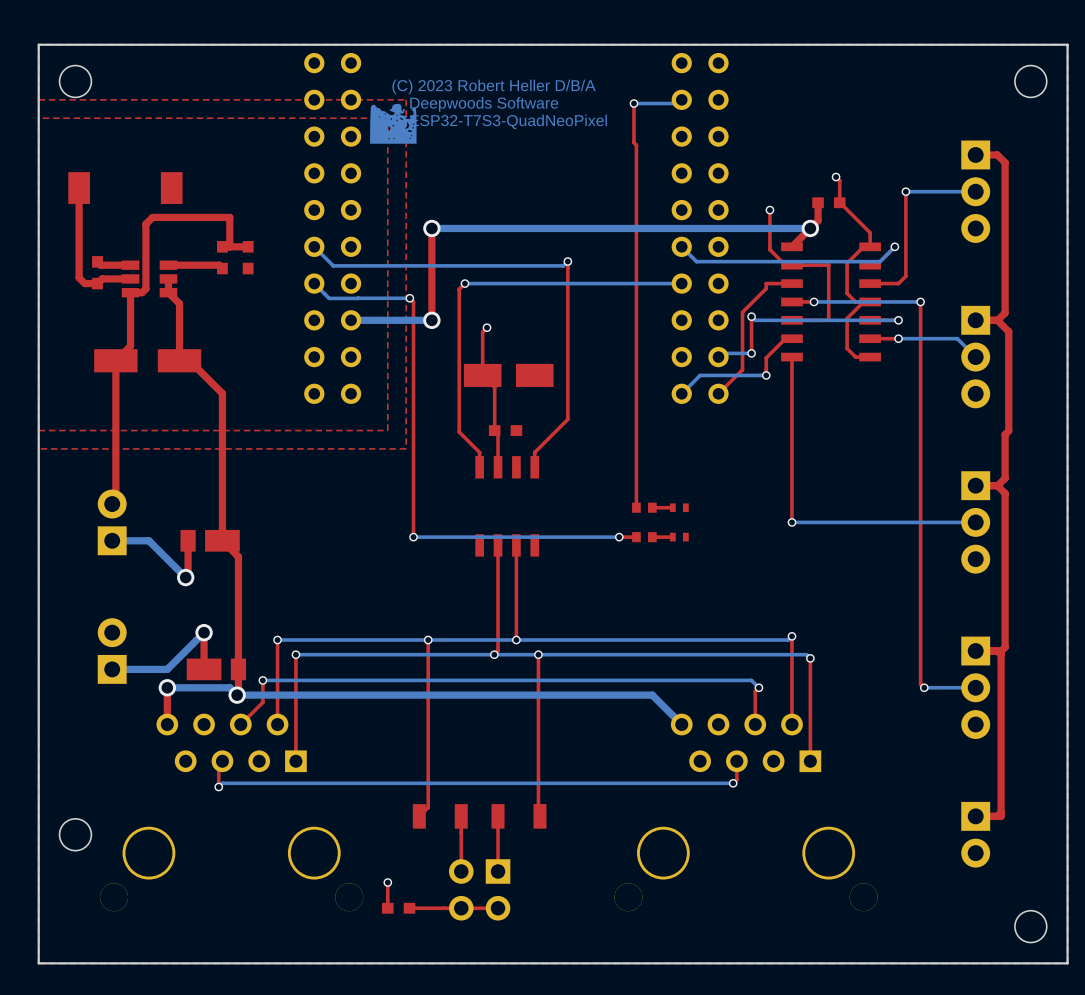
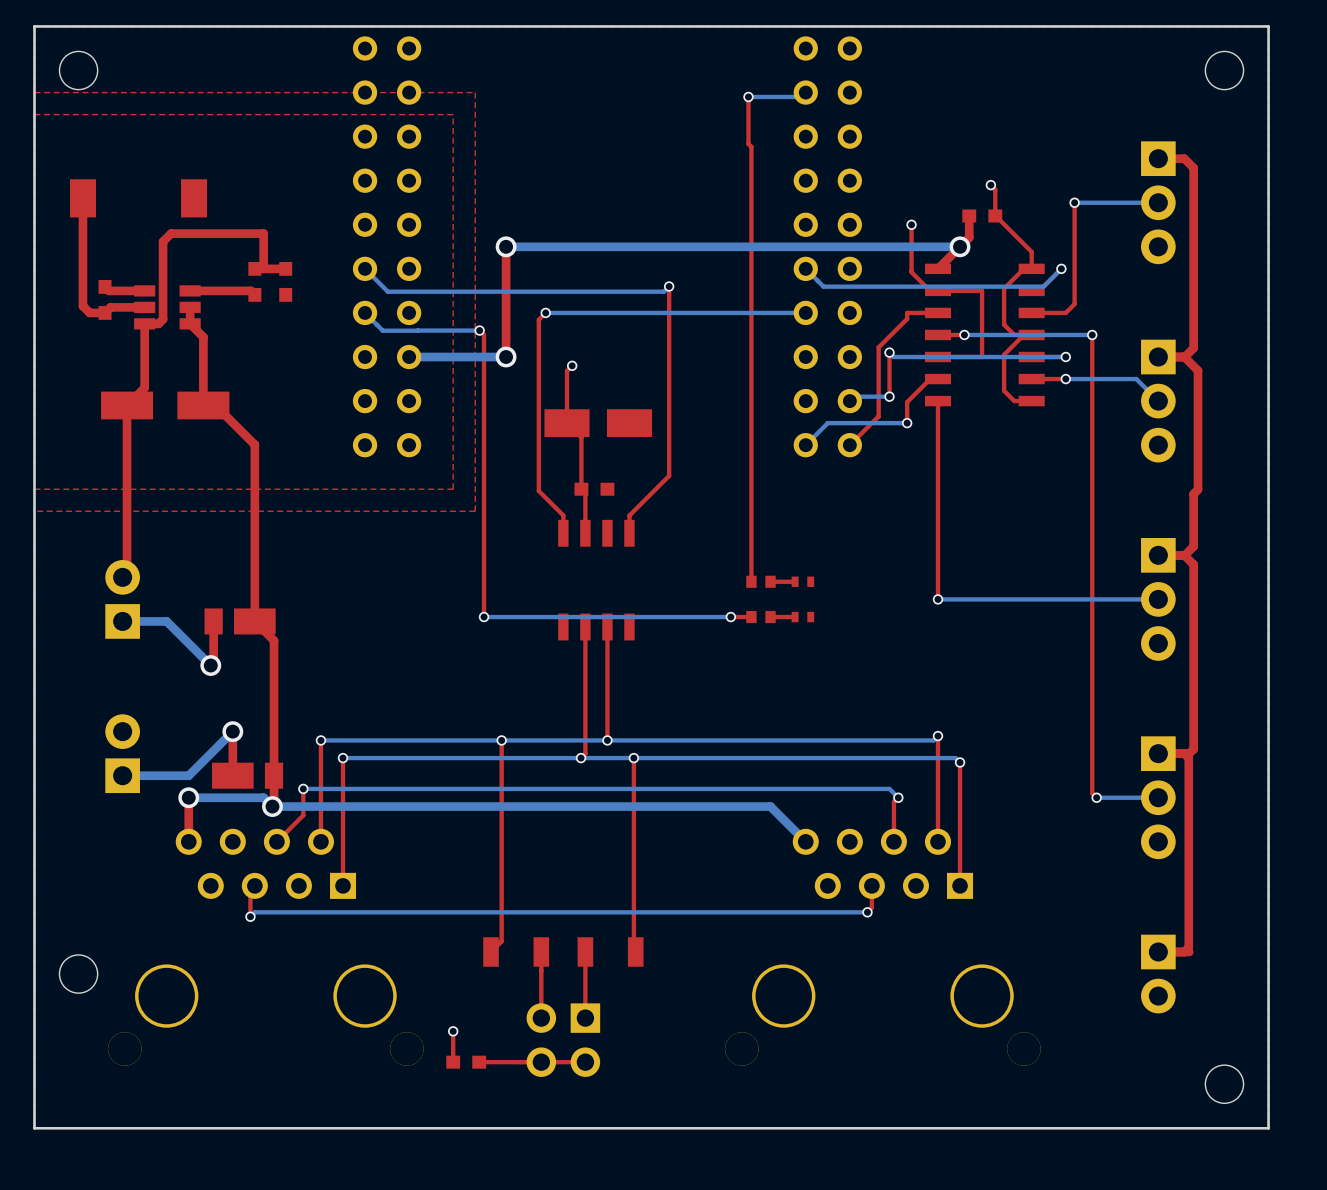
text: (C) 2023 Robert Heller D/B/A (494, 87) -> none
drawing: [370, 103, 417, 144] -> none
text: Deepwoods Software (484, 104) -> none
text: ESP32-T7S3-QuadNeoPixel (508, 121) -> none

